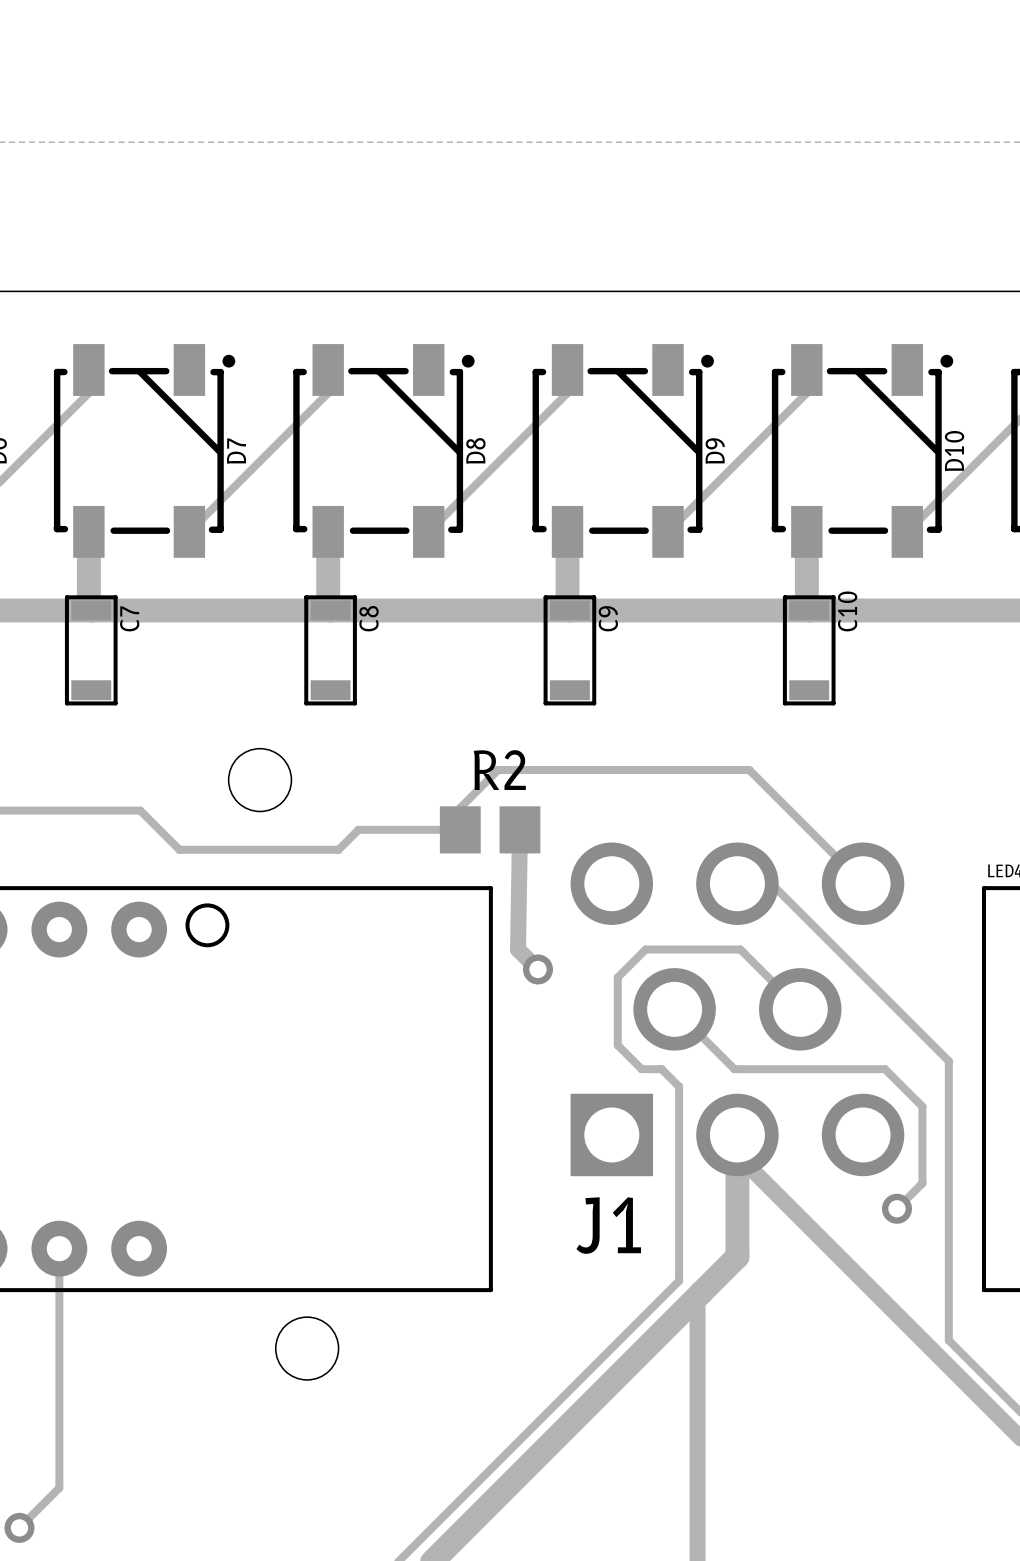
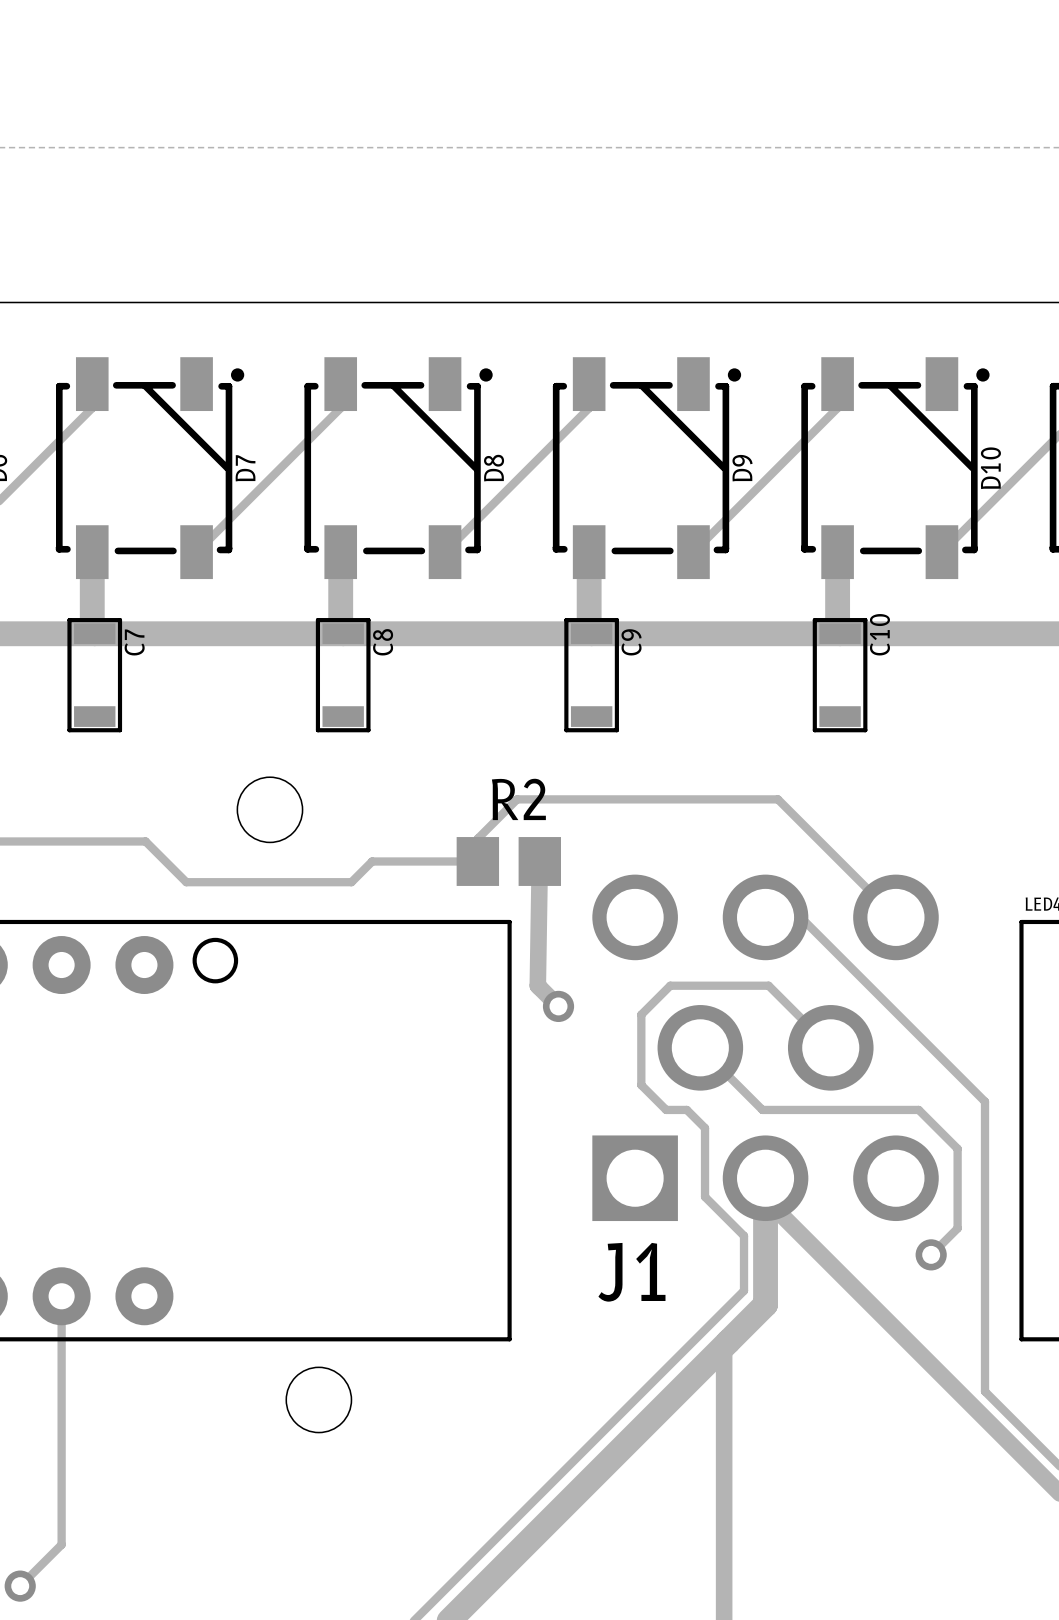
track: (679, 1152) (679, 1280) -> (705, 1196) (744, 1235) (744, 1290) (705, 1329)

